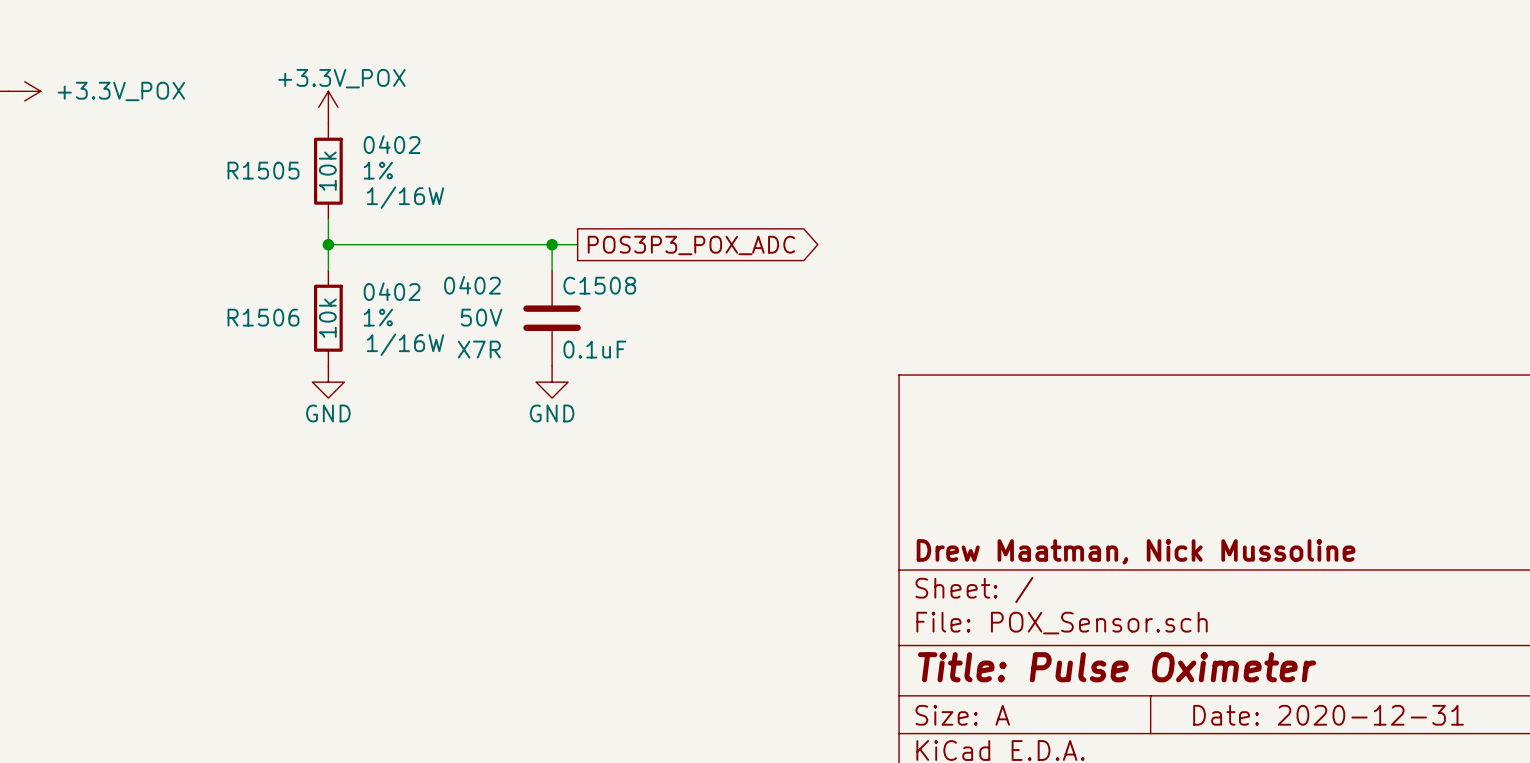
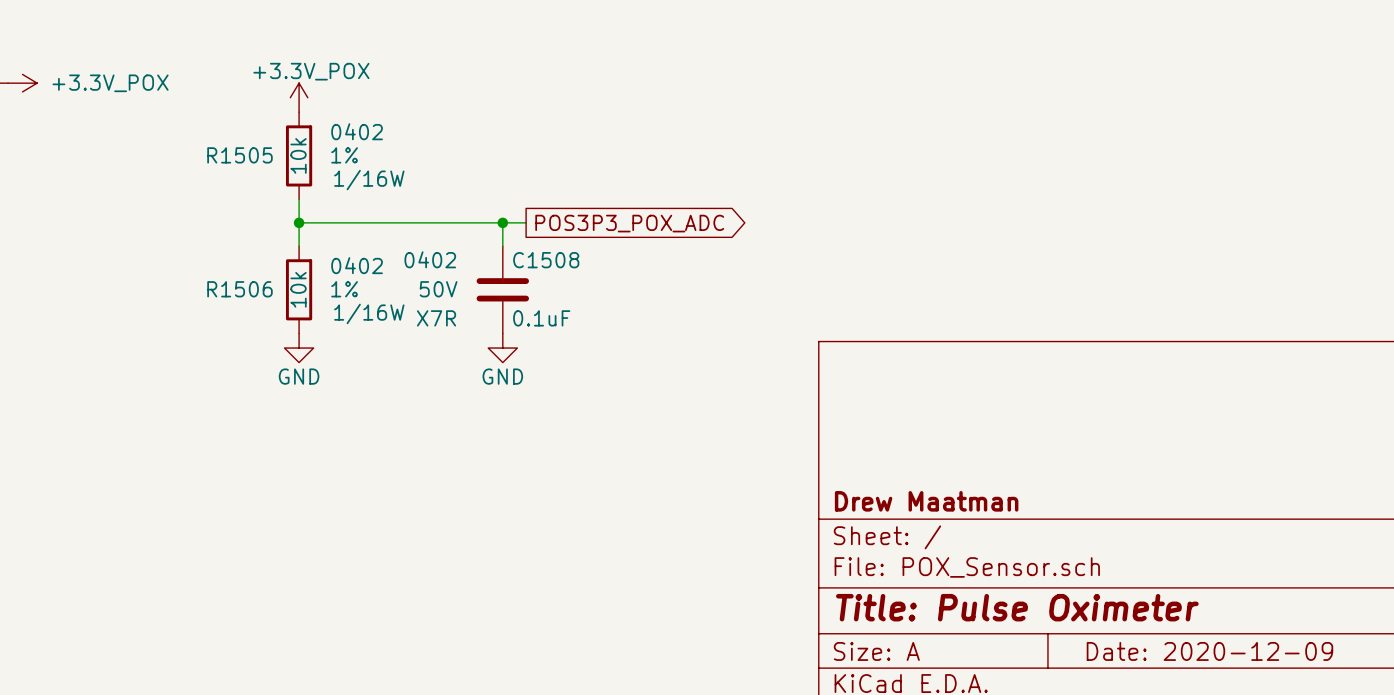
title block: Drew Maatman, Nick Mussoline (1136, 551) -> Drew Maatman (926, 501)
title block: Date: 2020-12-31 (1328, 715) -> Date: 2020-12-09 (1209, 651)

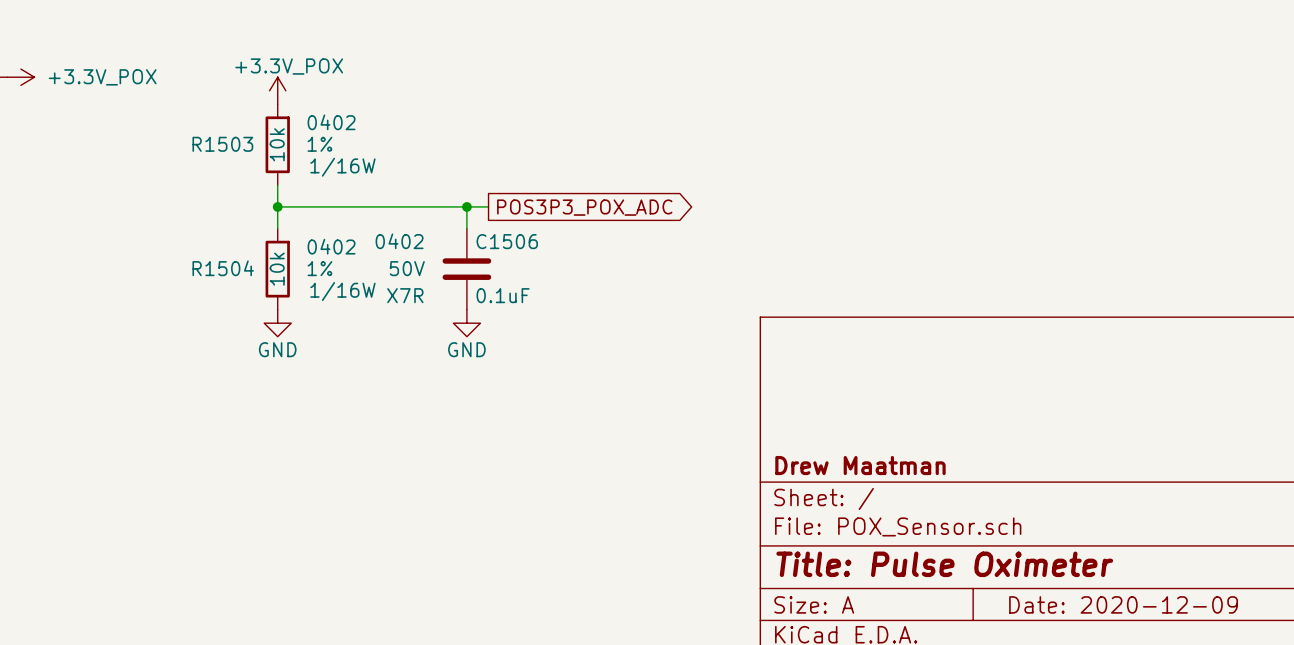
R1505 name: R1505 (239, 155) -> R1503 (222, 144)
C1508 name: C1508 (546, 260) -> C1506 (507, 241)
R1506 name: R1506 (239, 289) -> R1504 (223, 268)

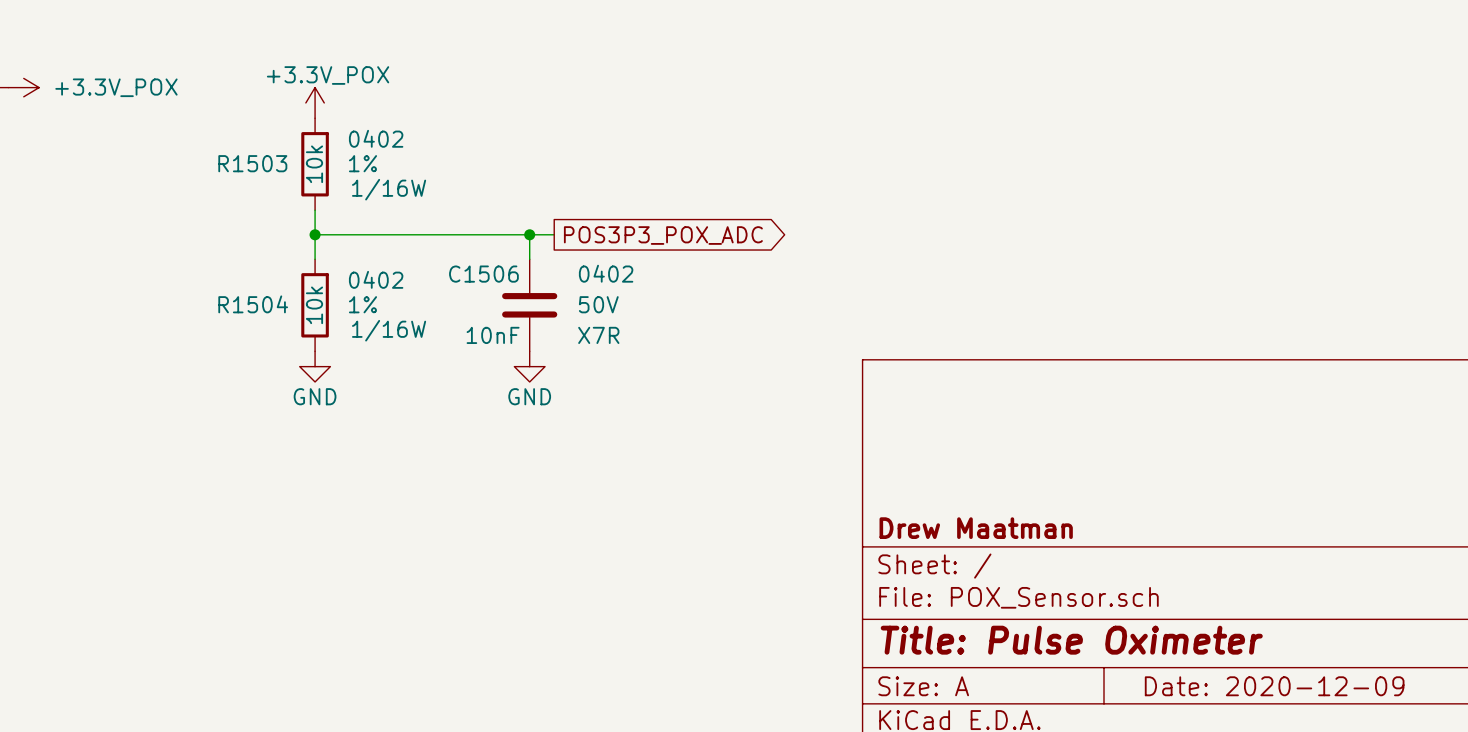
C1506 text position: 0402 (399, 241) -> 0402 (606, 273)
C1506 name position: C1506 (507, 241) -> C1506 (483, 274)
C1506 text position: 50V (407, 268) -> 50V (598, 304)
C1506 text position: X7R (405, 295) -> X7R (598, 335)
C1506 value: 0.1uF (503, 295) -> 10nF (493, 335)

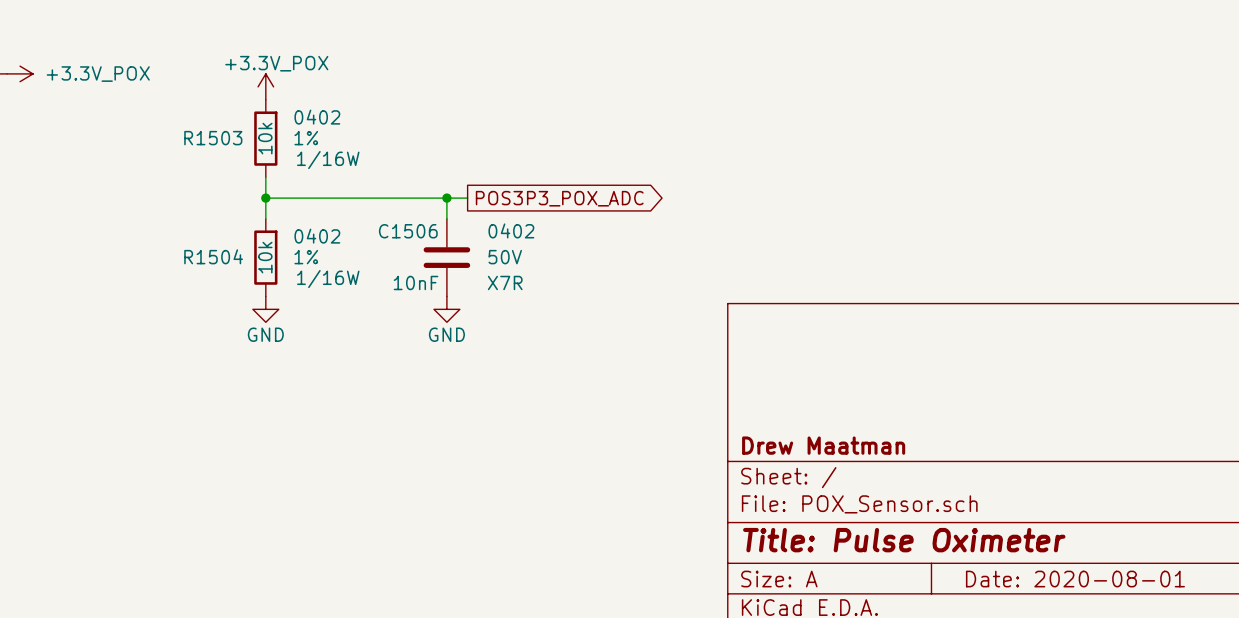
title block: Date: 2020-12-09 (1274, 686) -> Date: 2020-08-01 (1075, 579)

